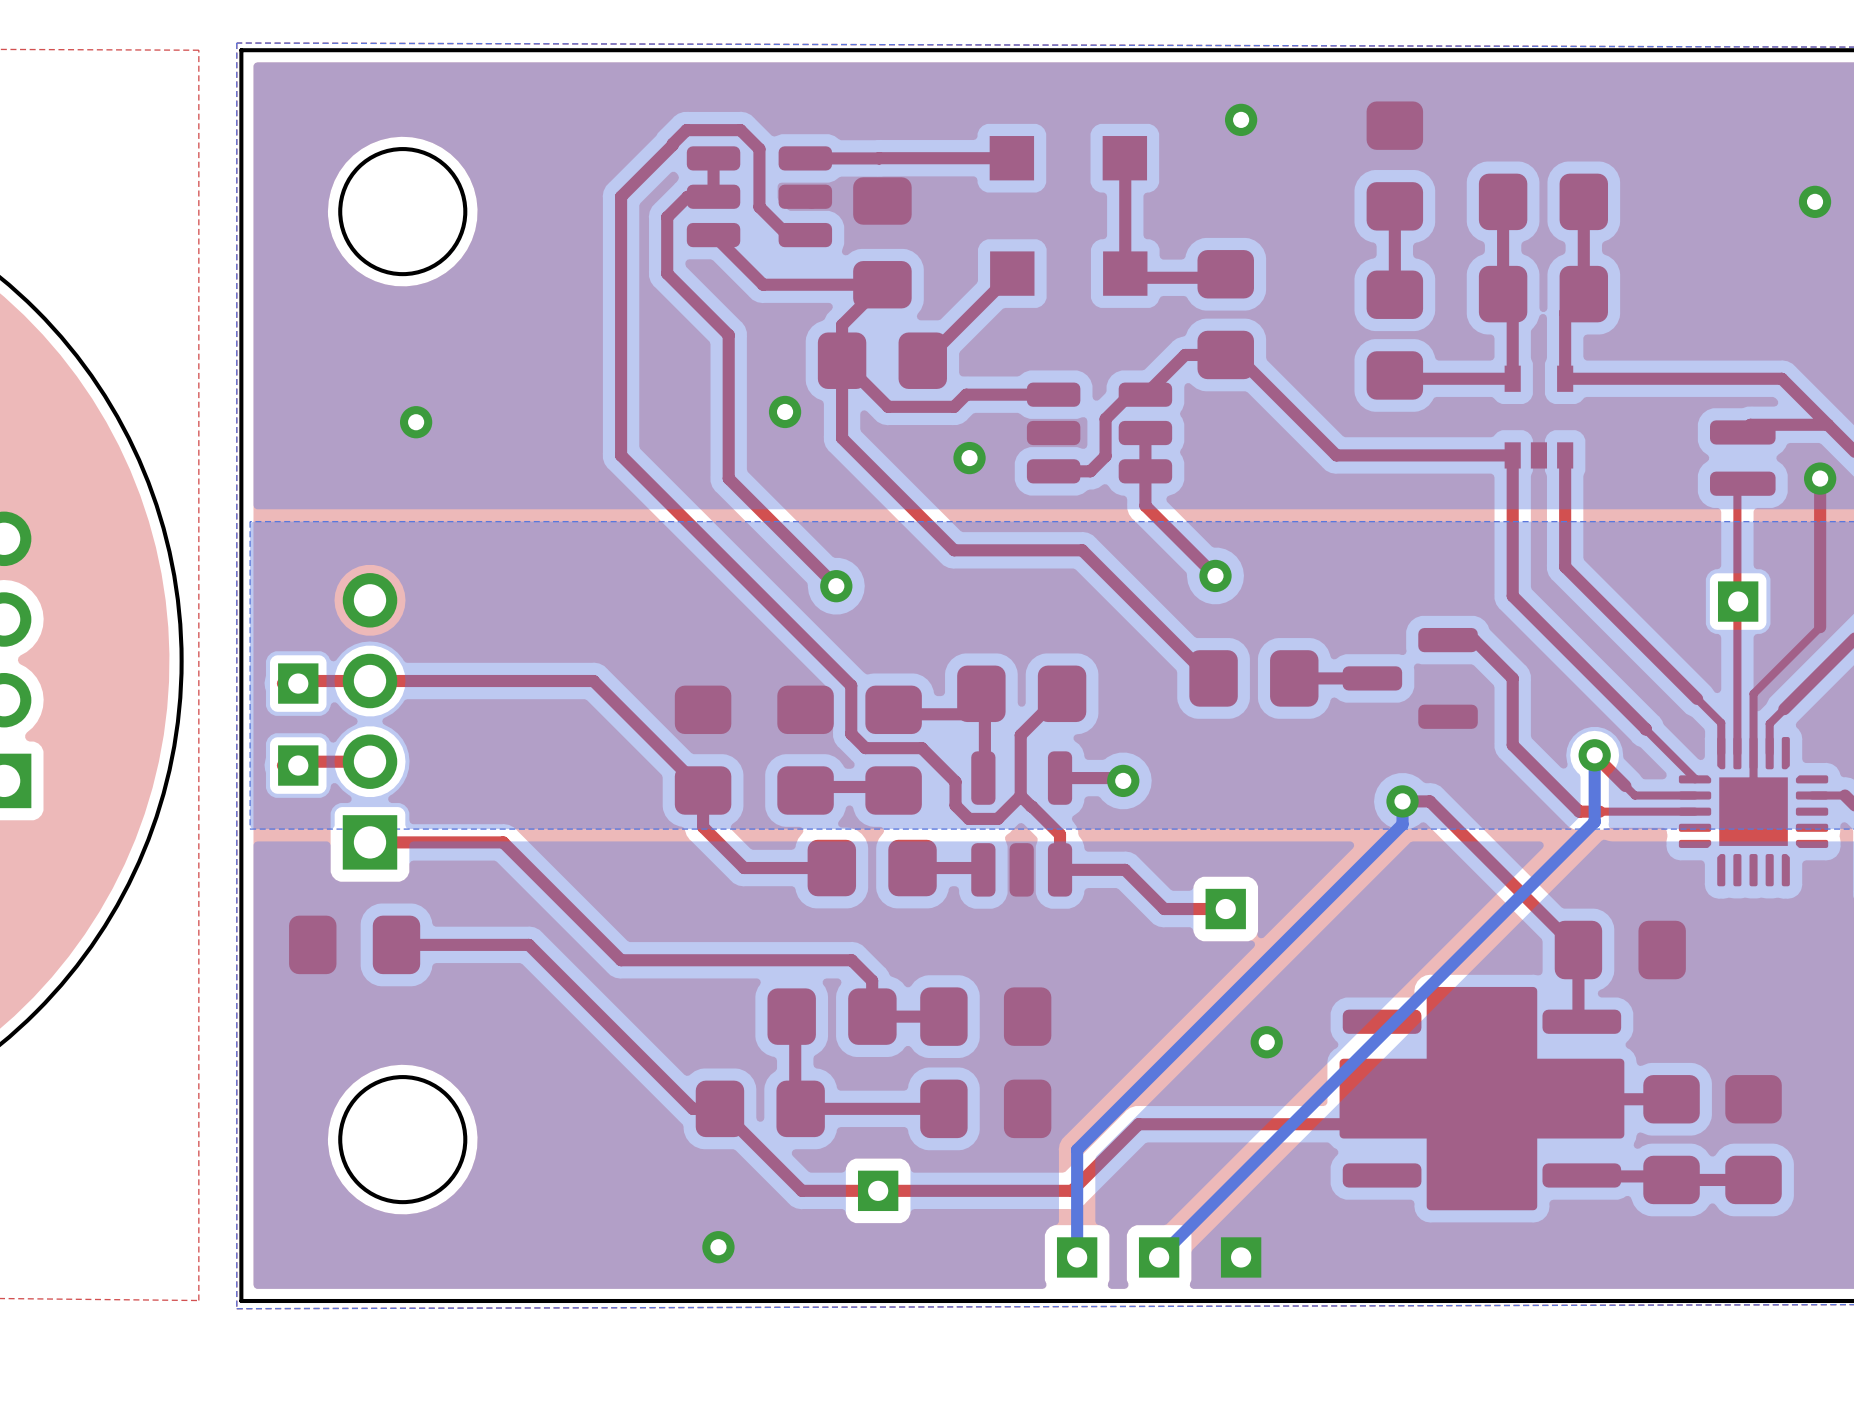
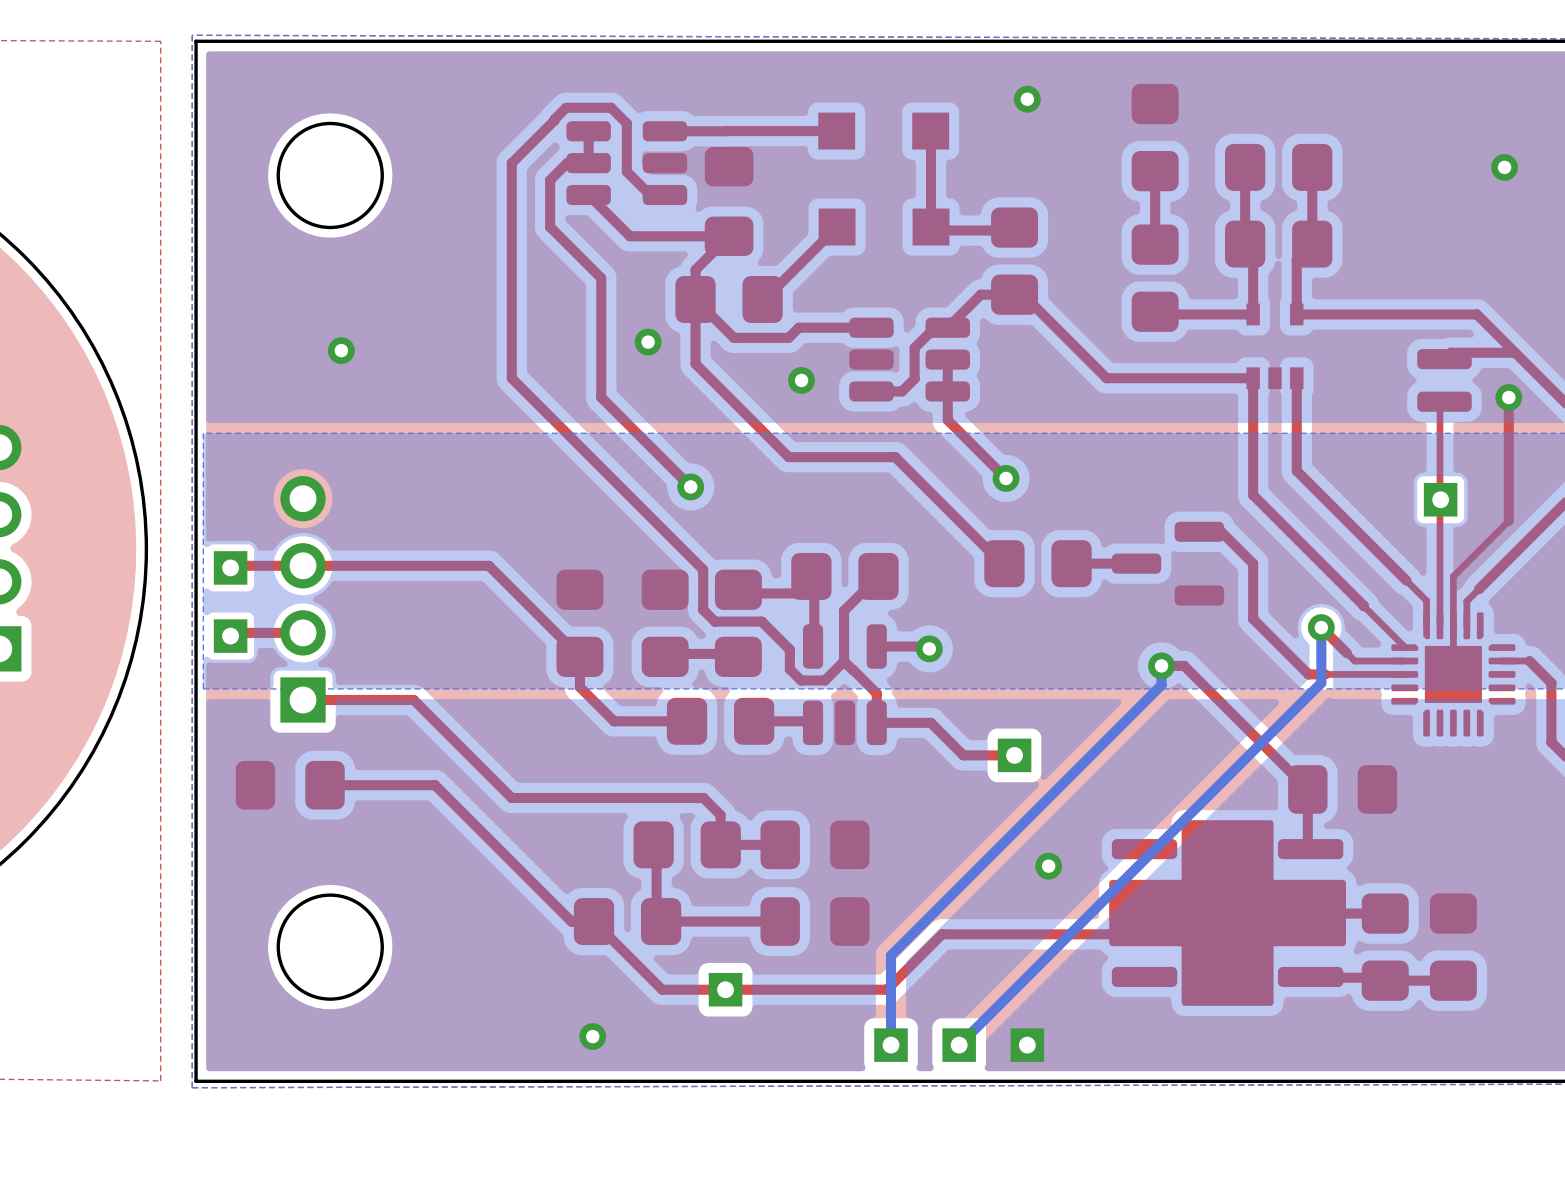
part position: (298, 683) -> (230, 567)
part position: (298, 765) -> (230, 636)

